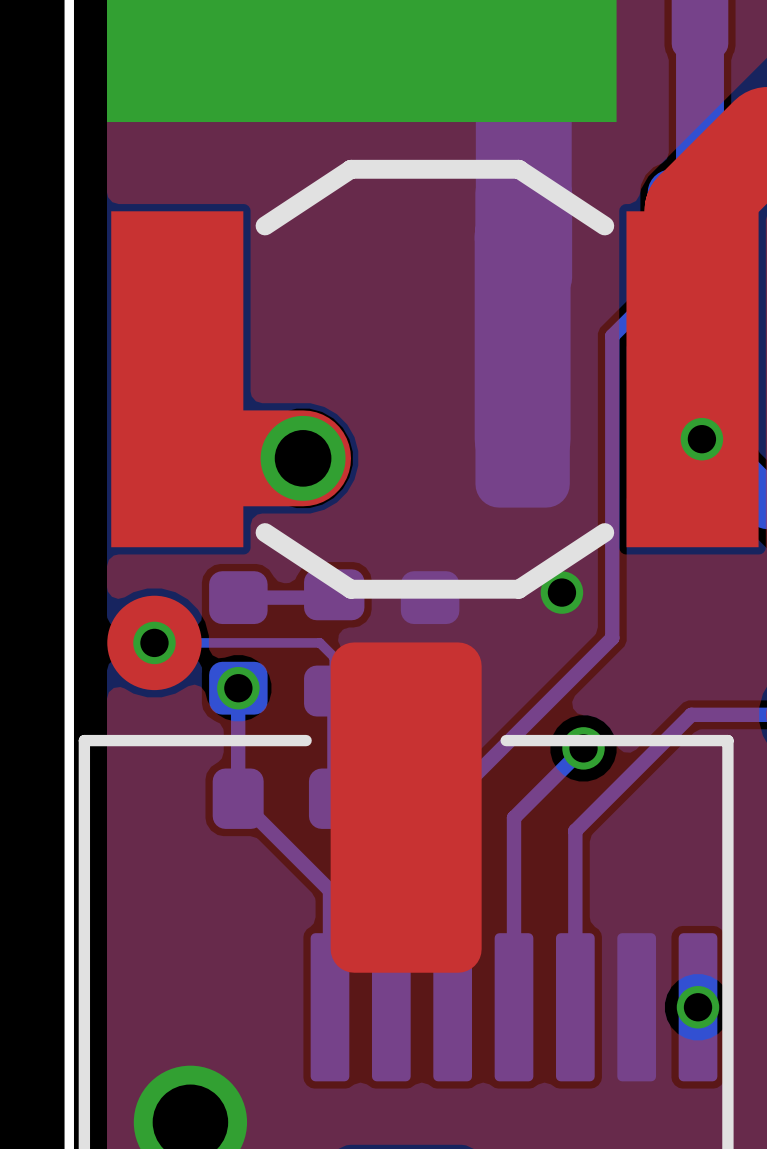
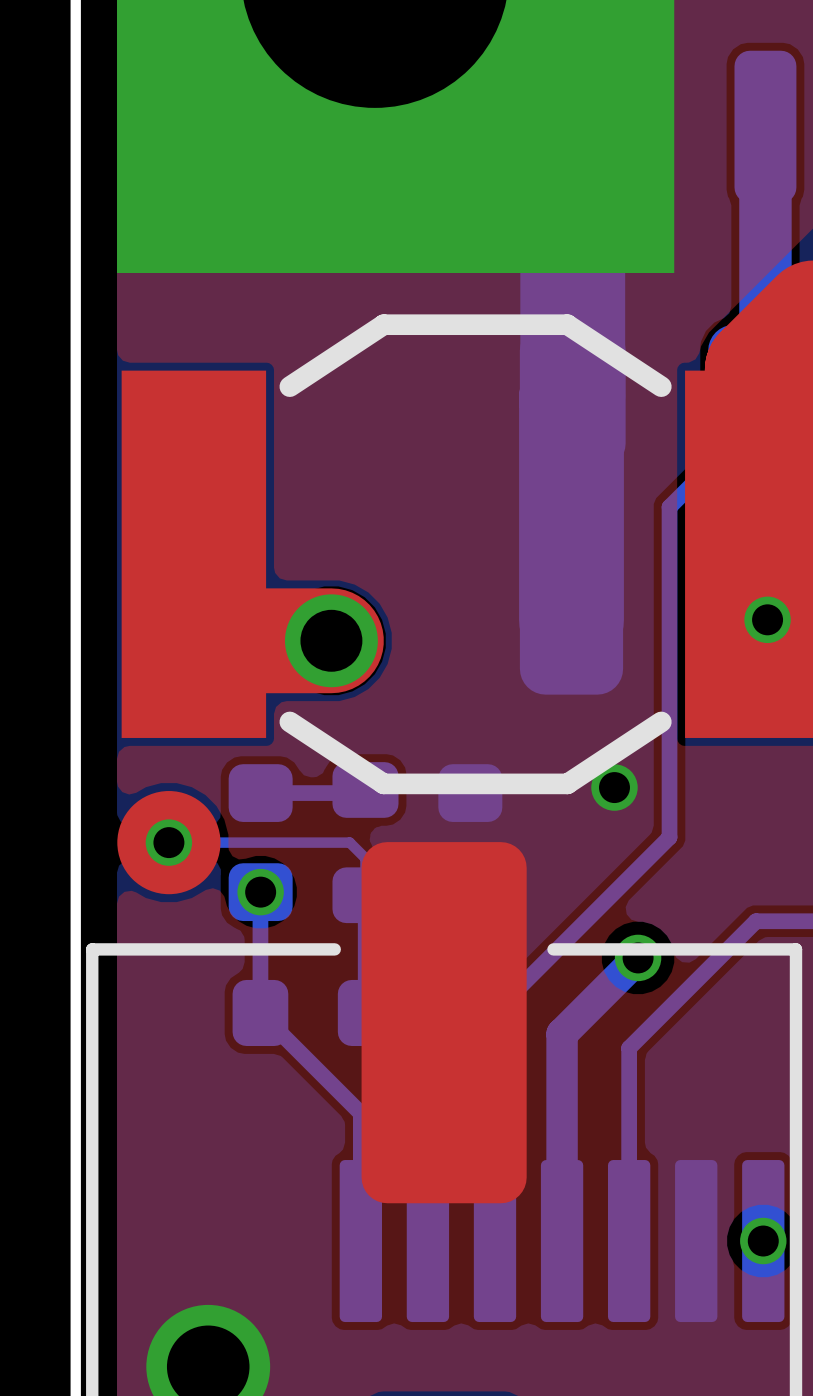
bottom track width: thin (583, 748) (514, 817) (514, 1007) -> thick (638, 957) (562, 1033) (562, 1241)

